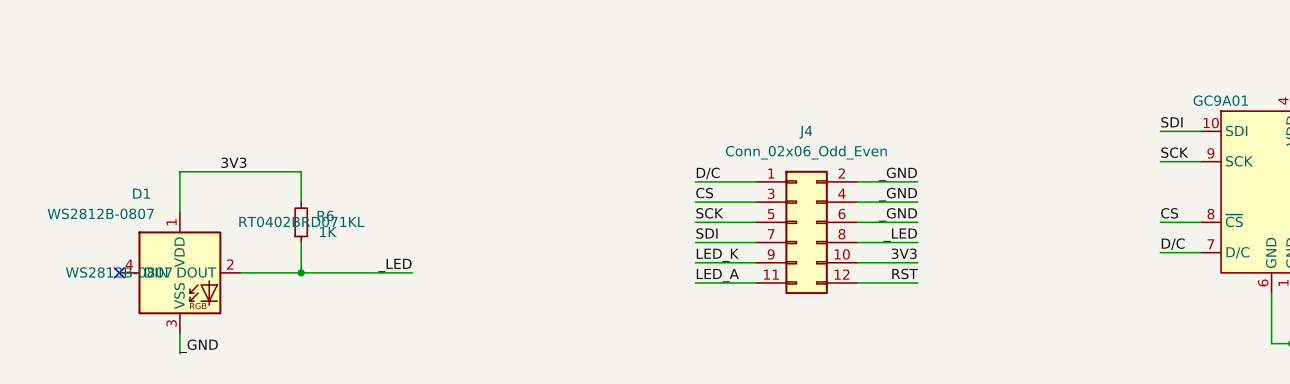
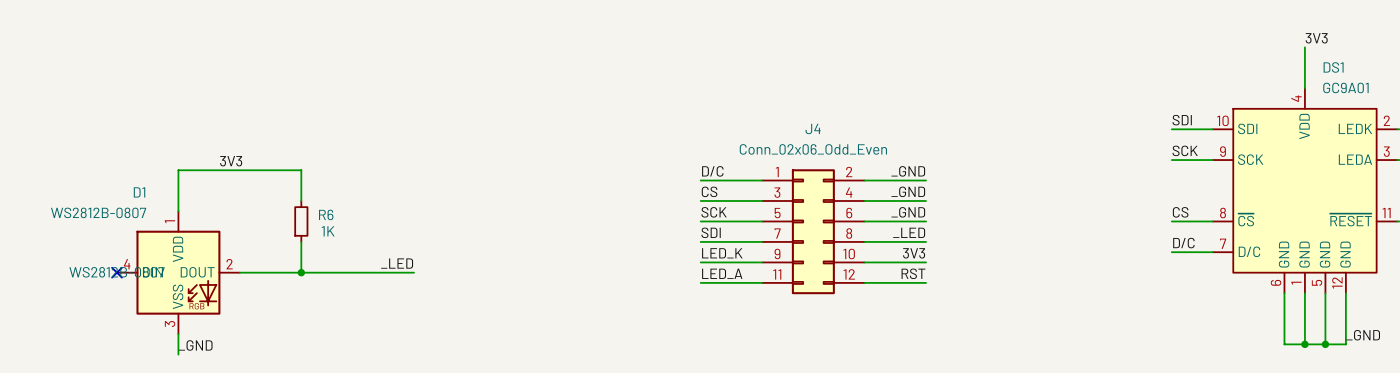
DS1 text: GC9A01 (1220, 100) -> none
R6 text: RT0402BRD071KL (301, 221) -> none

